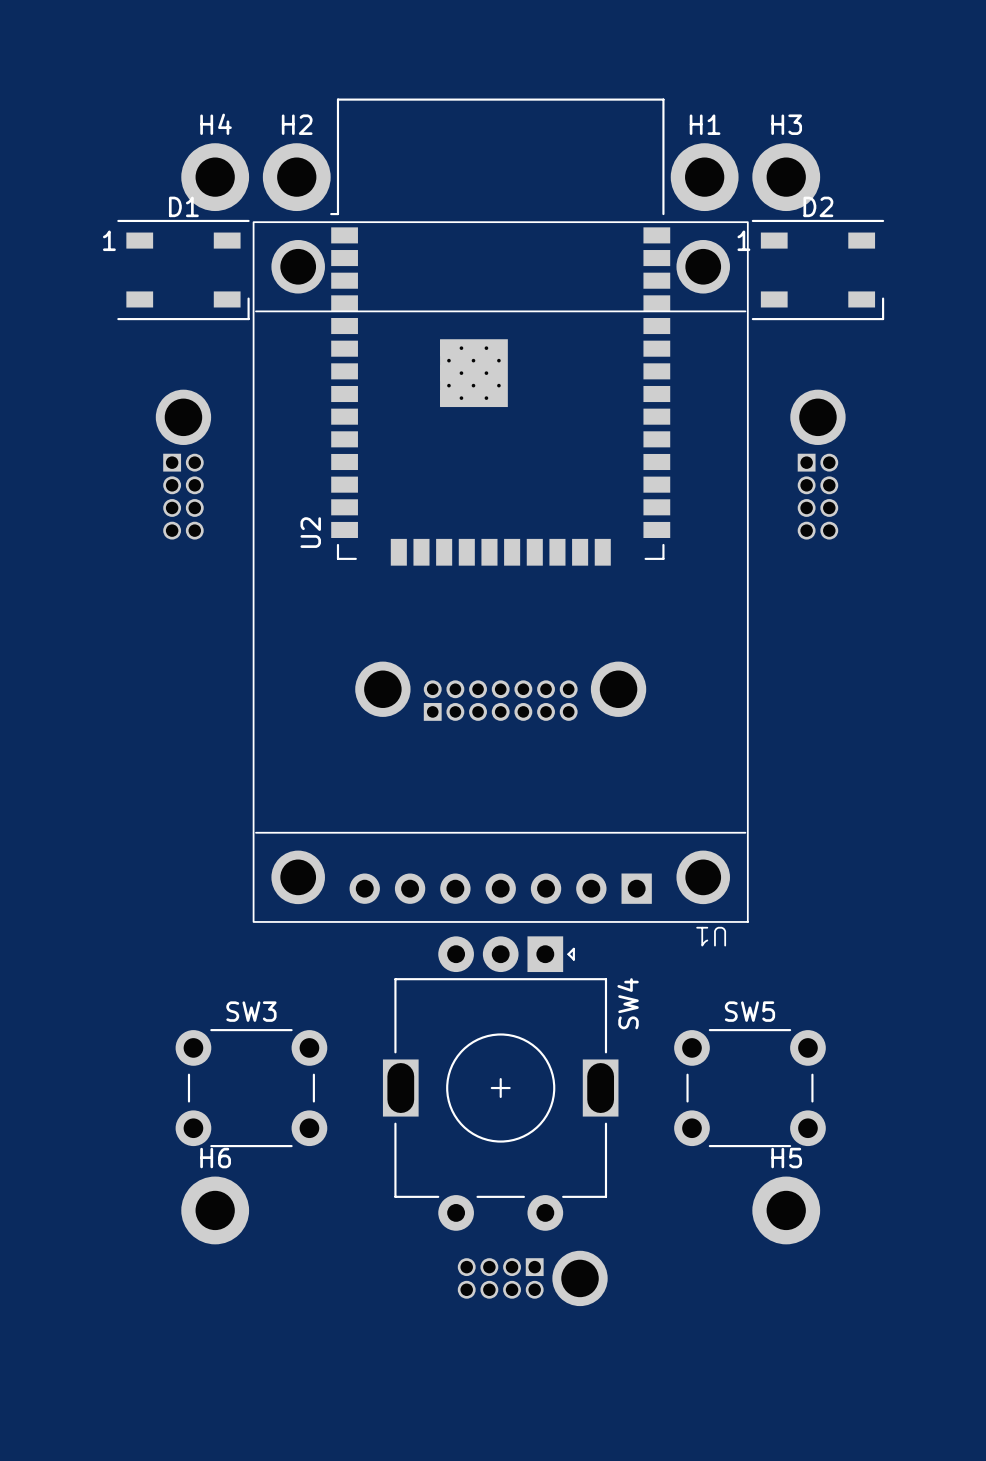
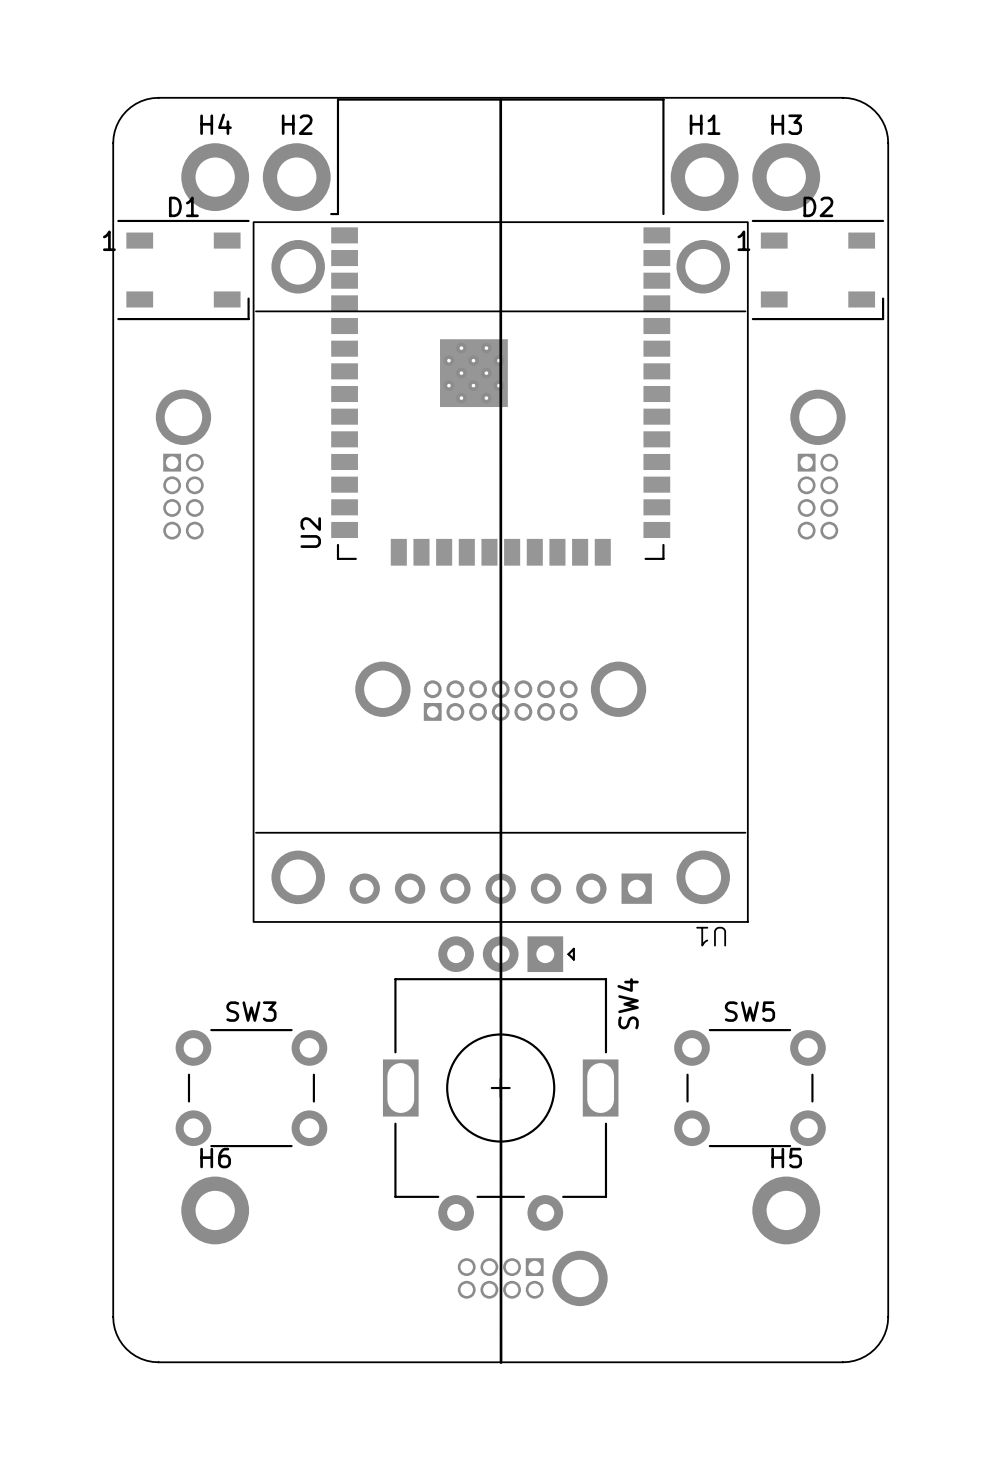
board edge: none -> (158, 97) (842, 97) (854, 99) (865, 103) (874, 111) (882, 120) (886, 131) (888, 143) (888, 1316) (886, 1328) (882, 1339) (874, 1349) (865, 1356) (854, 1360) (842, 1362) (158, 1362) (146, 1360) (135, 1356) (126, 1349) (119, 1339) (114, 1328) (113, 1316) (113, 143) (116, 125) (126, 111) (141, 101) (158, 97)
line: none -> (500, 99) (501, 1362)

